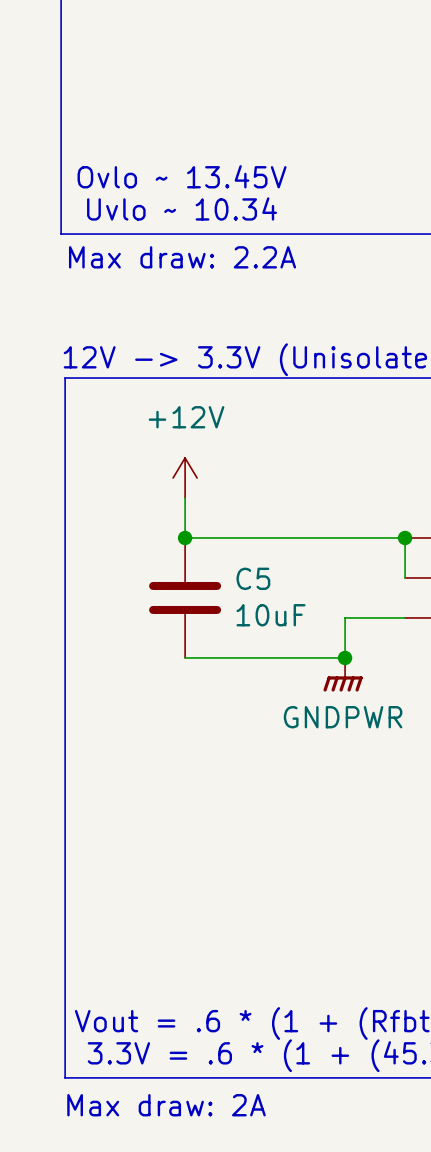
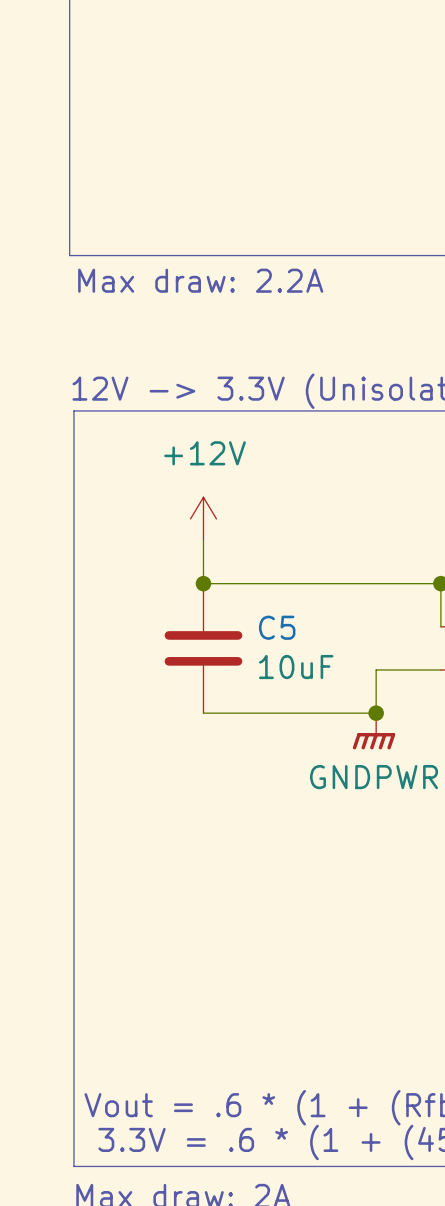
text: Ovlo ~ 13.45V (182, 176) -> none
text: Uvlo ~ 10.34 (182, 208) -> none

